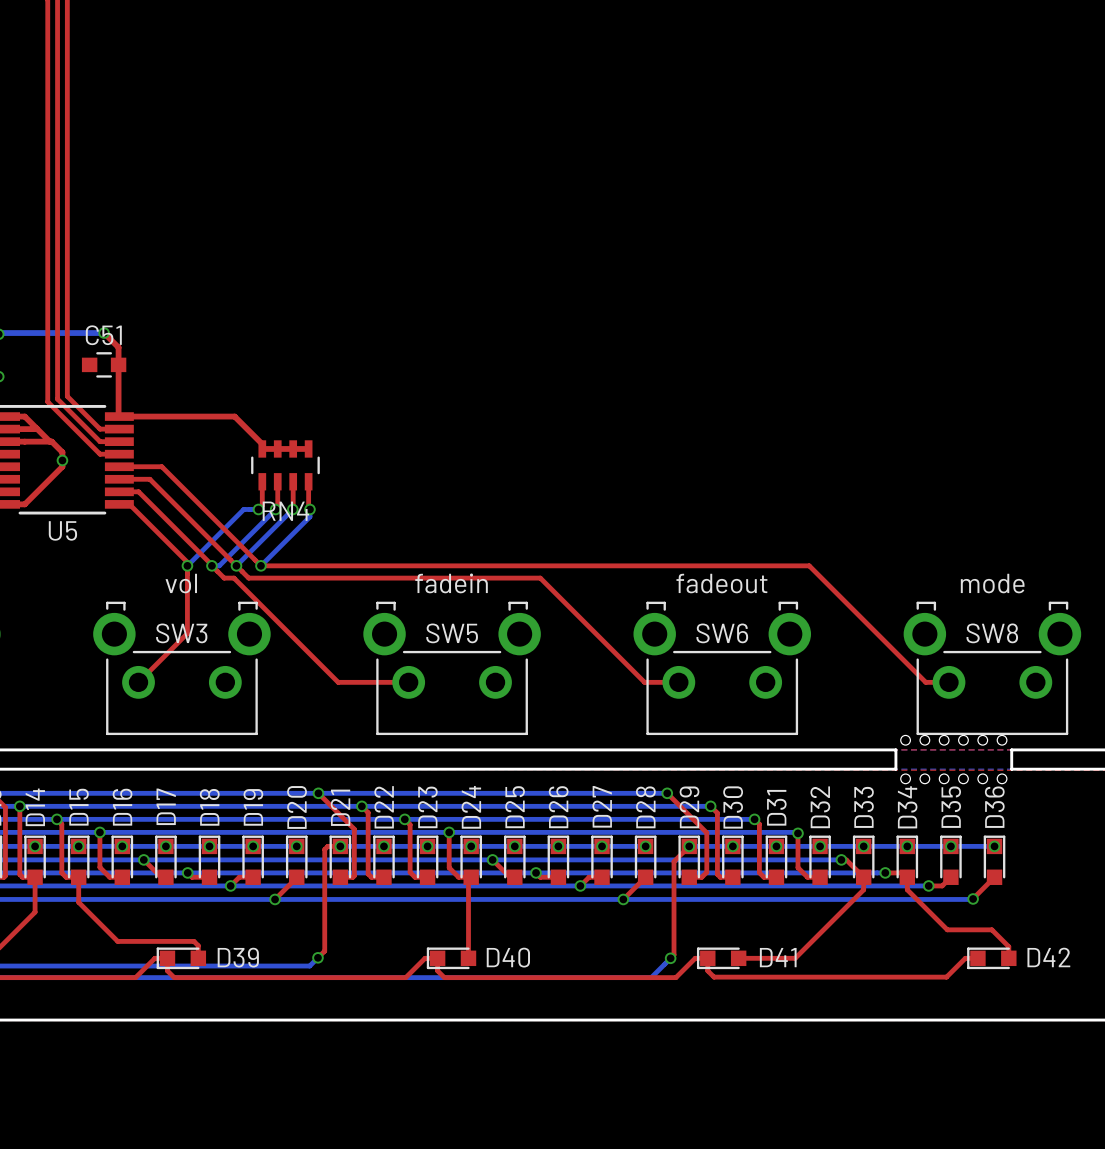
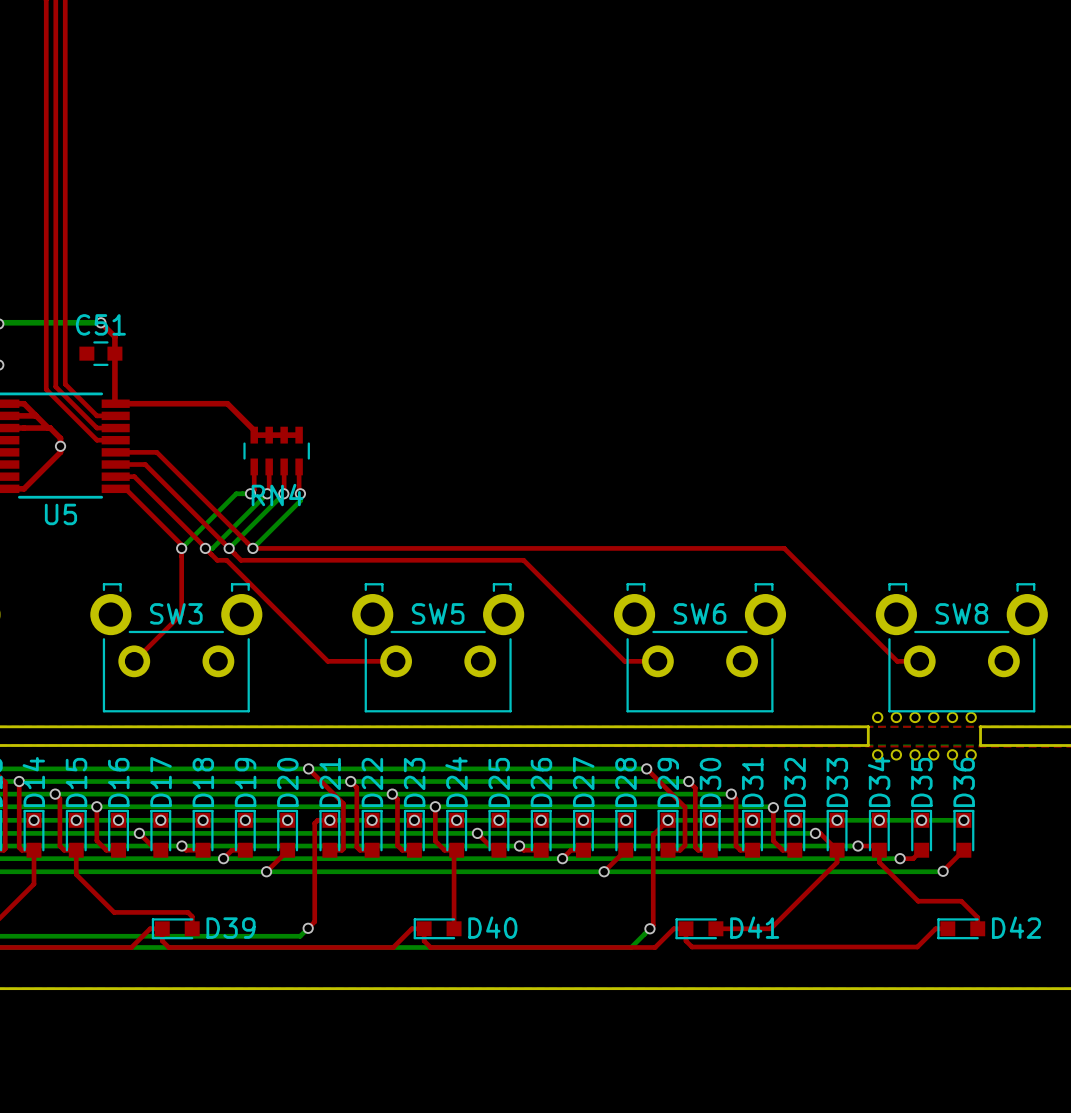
SW3 value: vol (181, 583) -> none
SW5 value: fadein (451, 583) -> none
SW6 value: fadeout (721, 583) -> none
SW8 value: mode (992, 583) -> none

